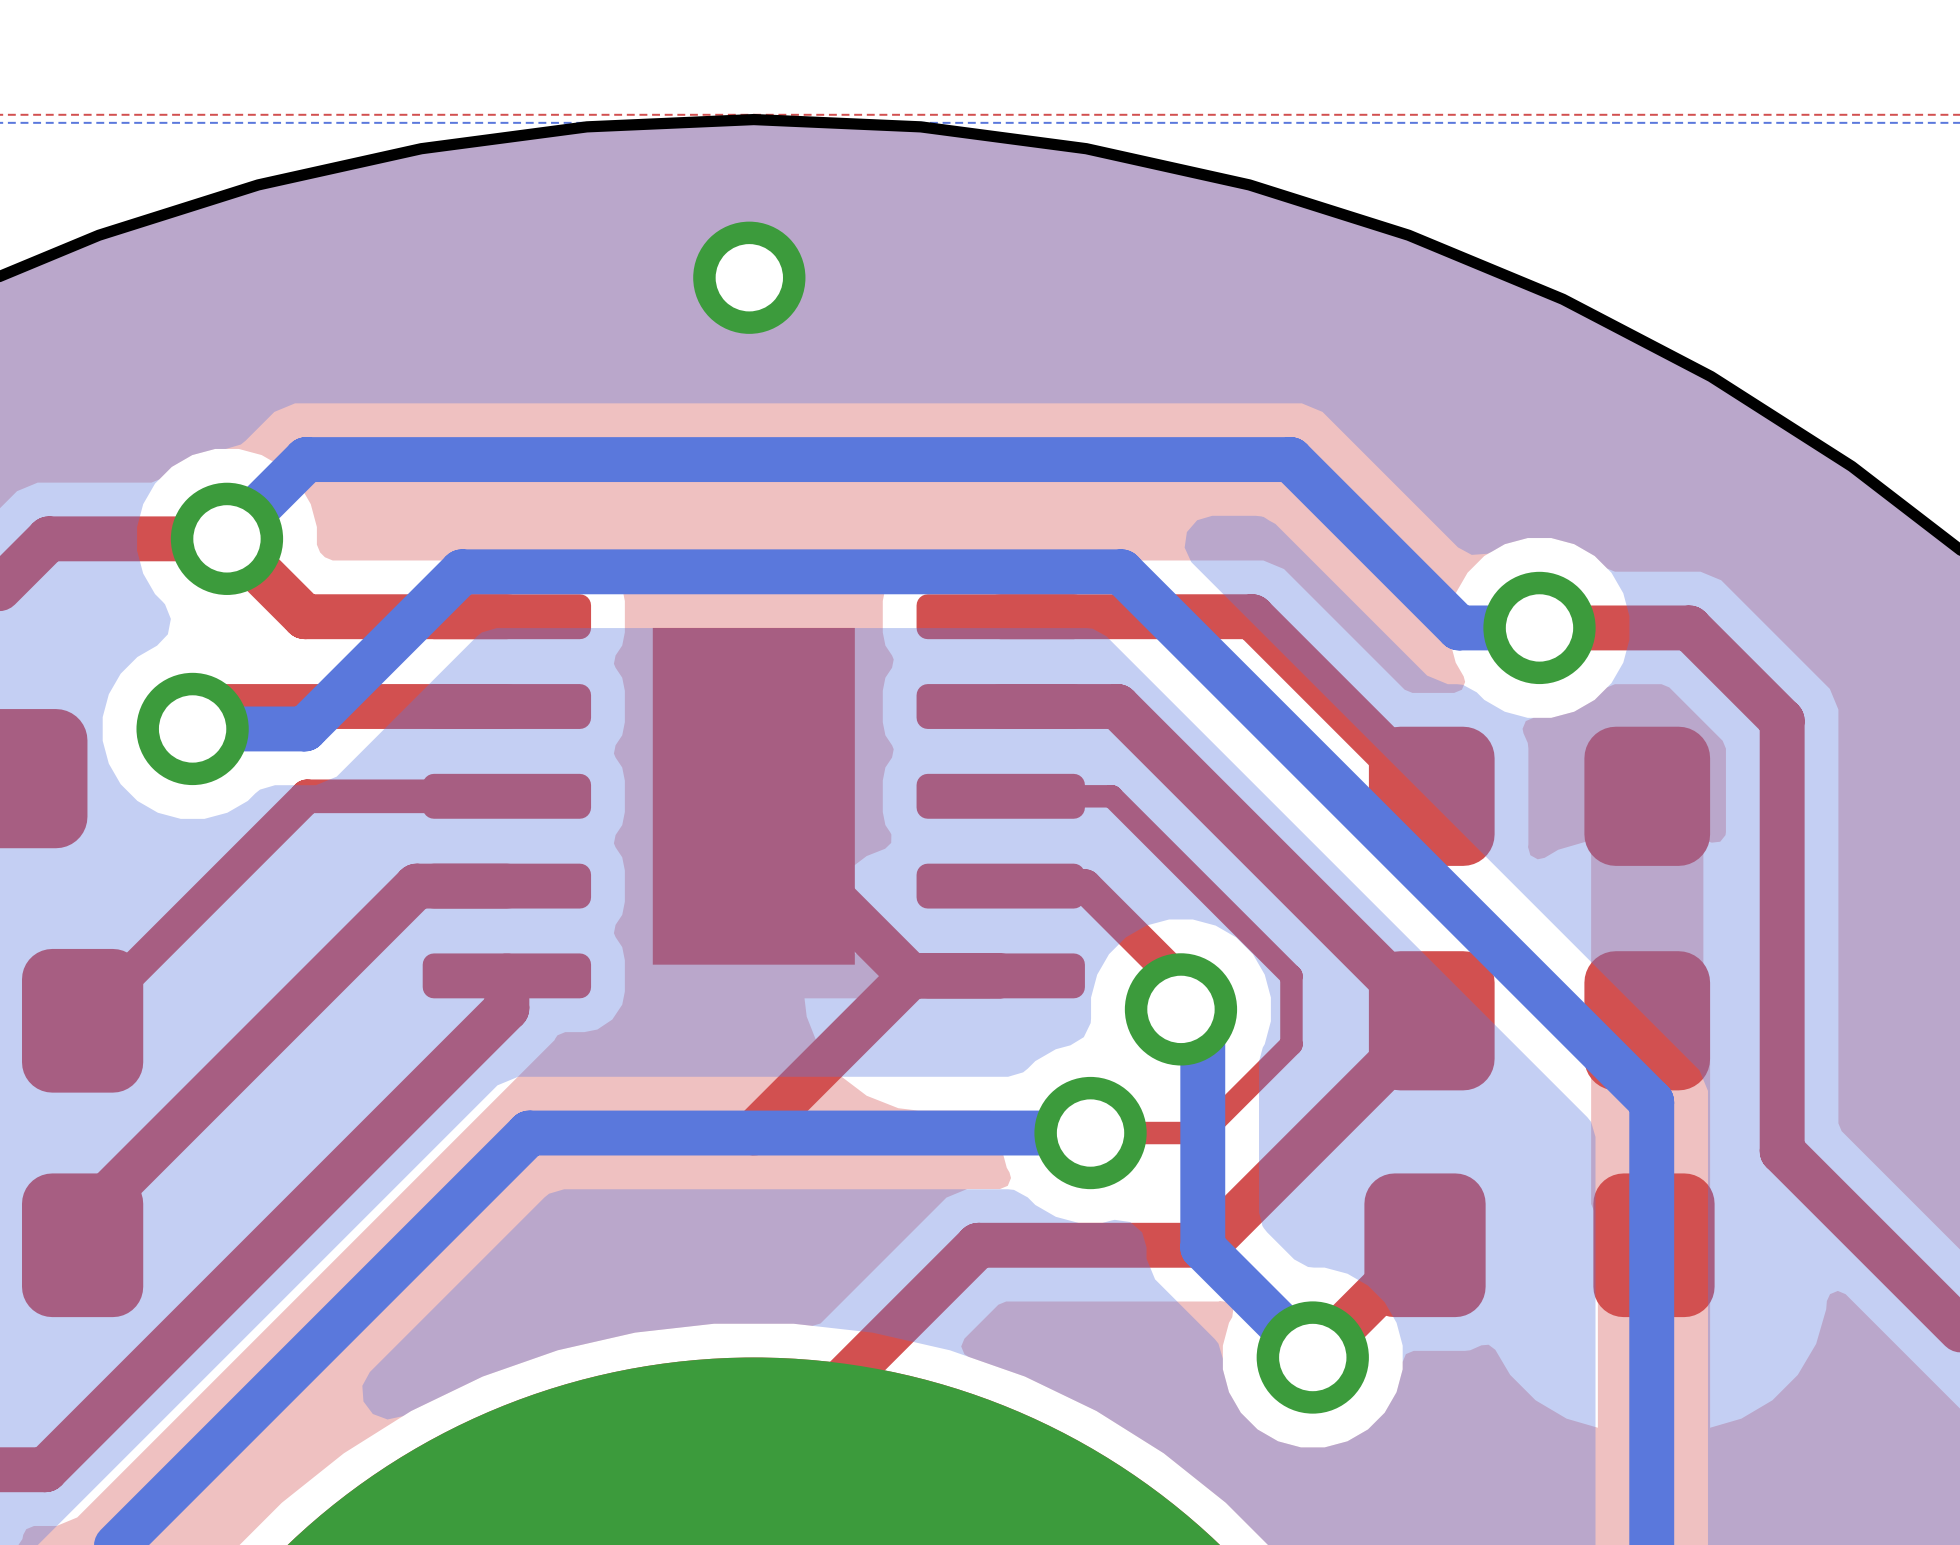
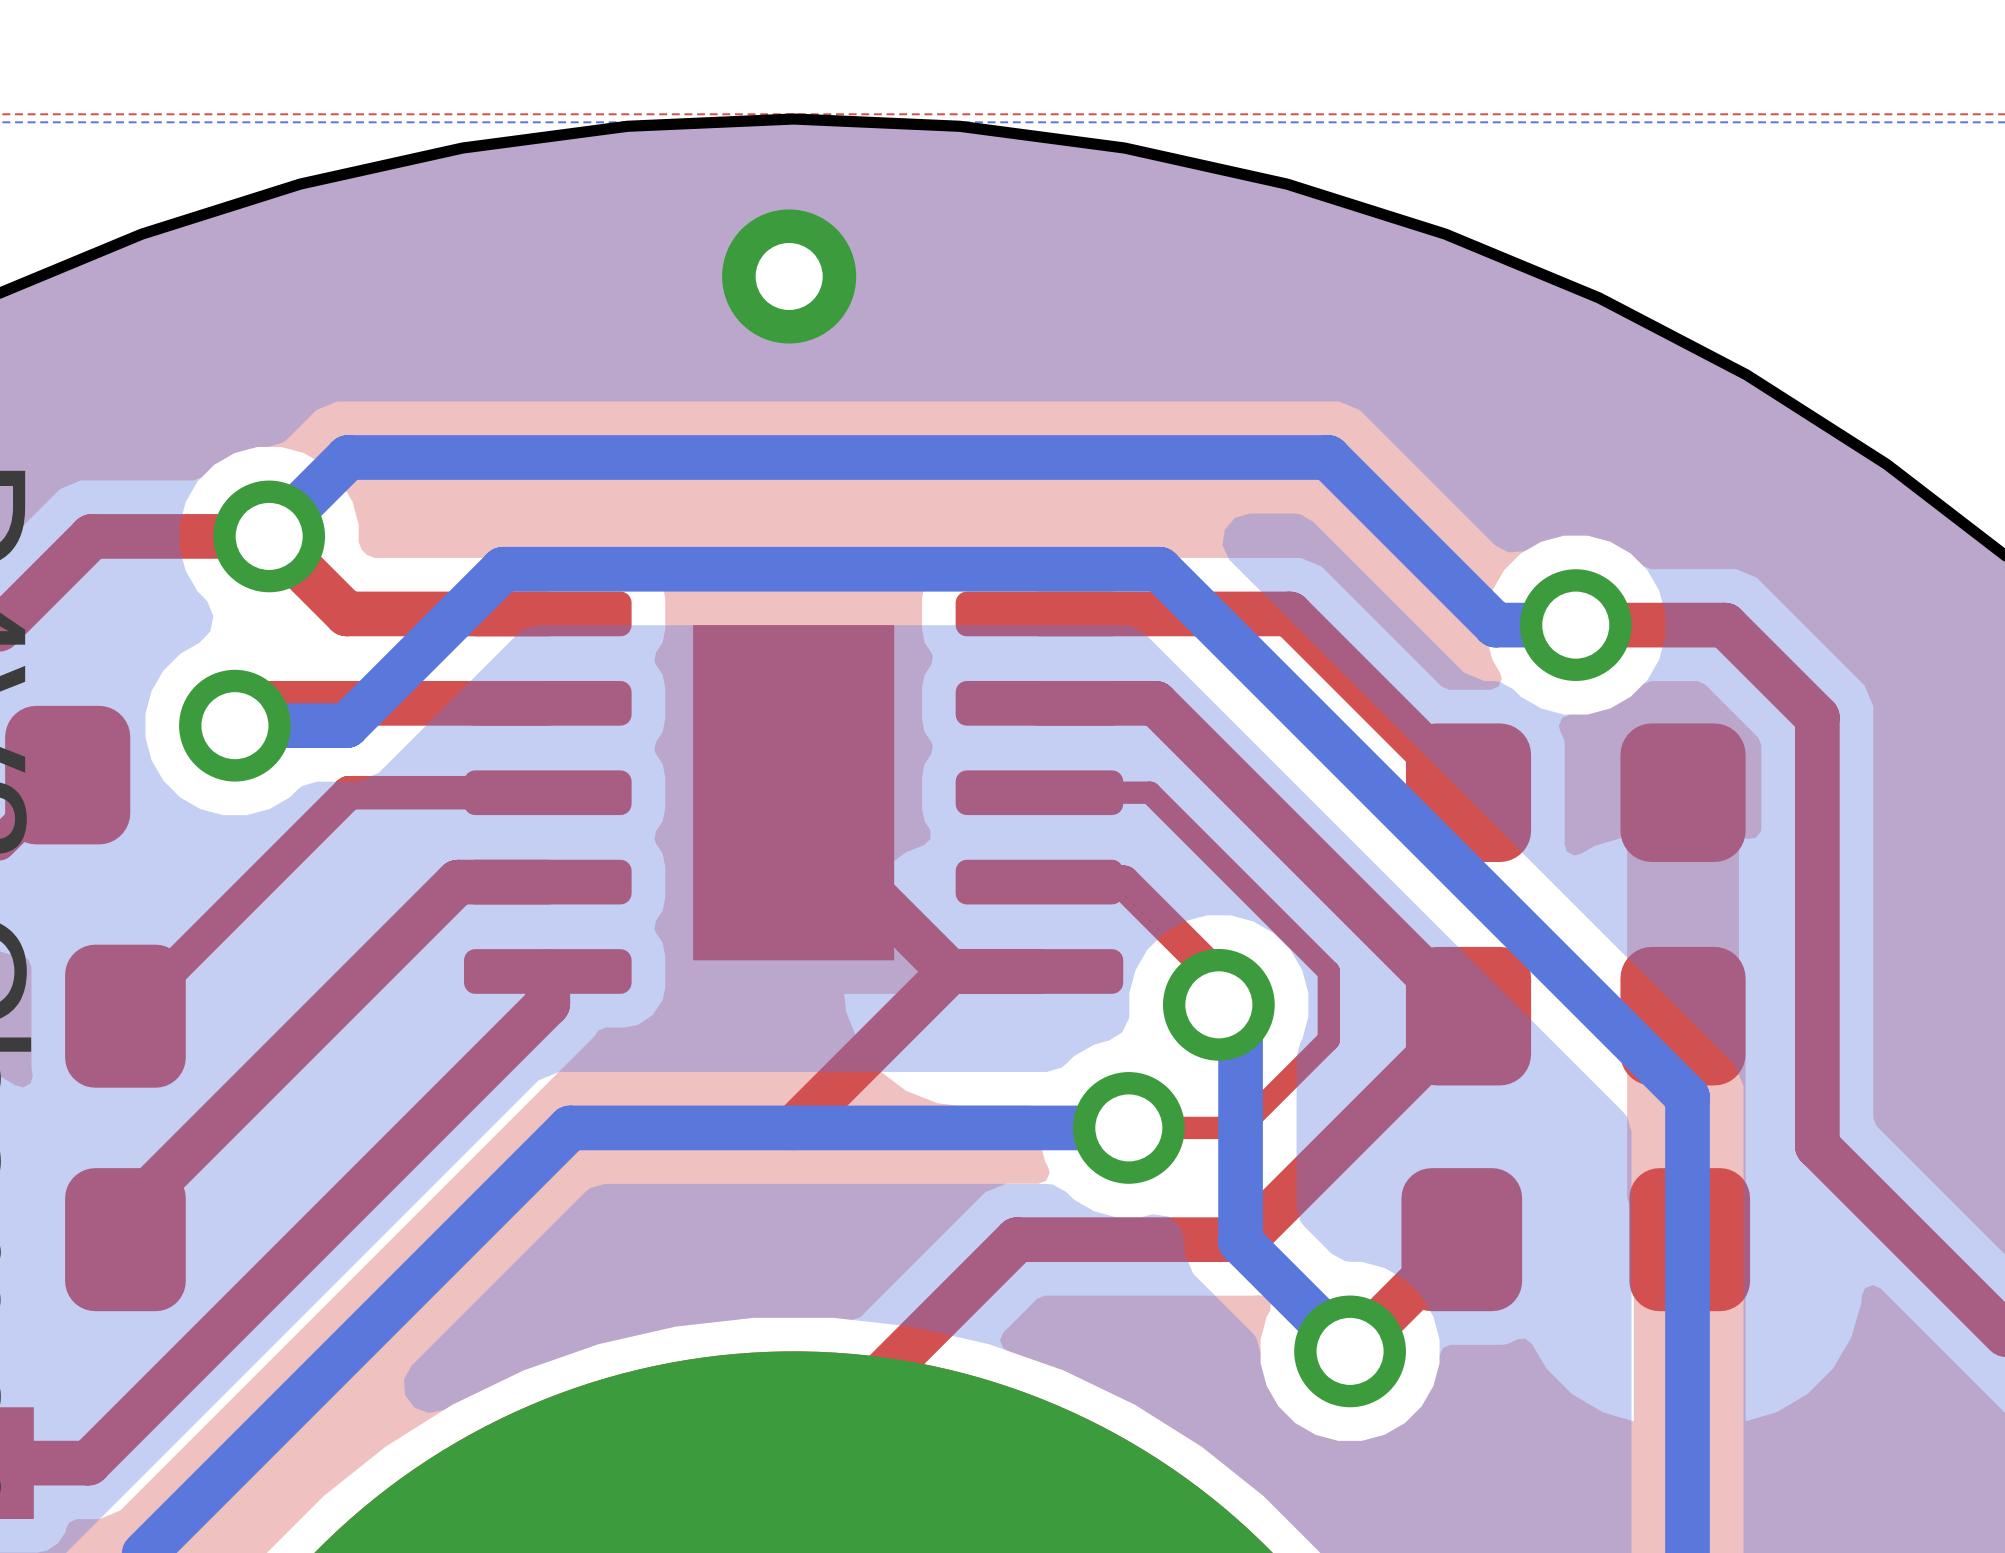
via size: [693, 221, 806, 334] -> [722, 209, 857, 344]

